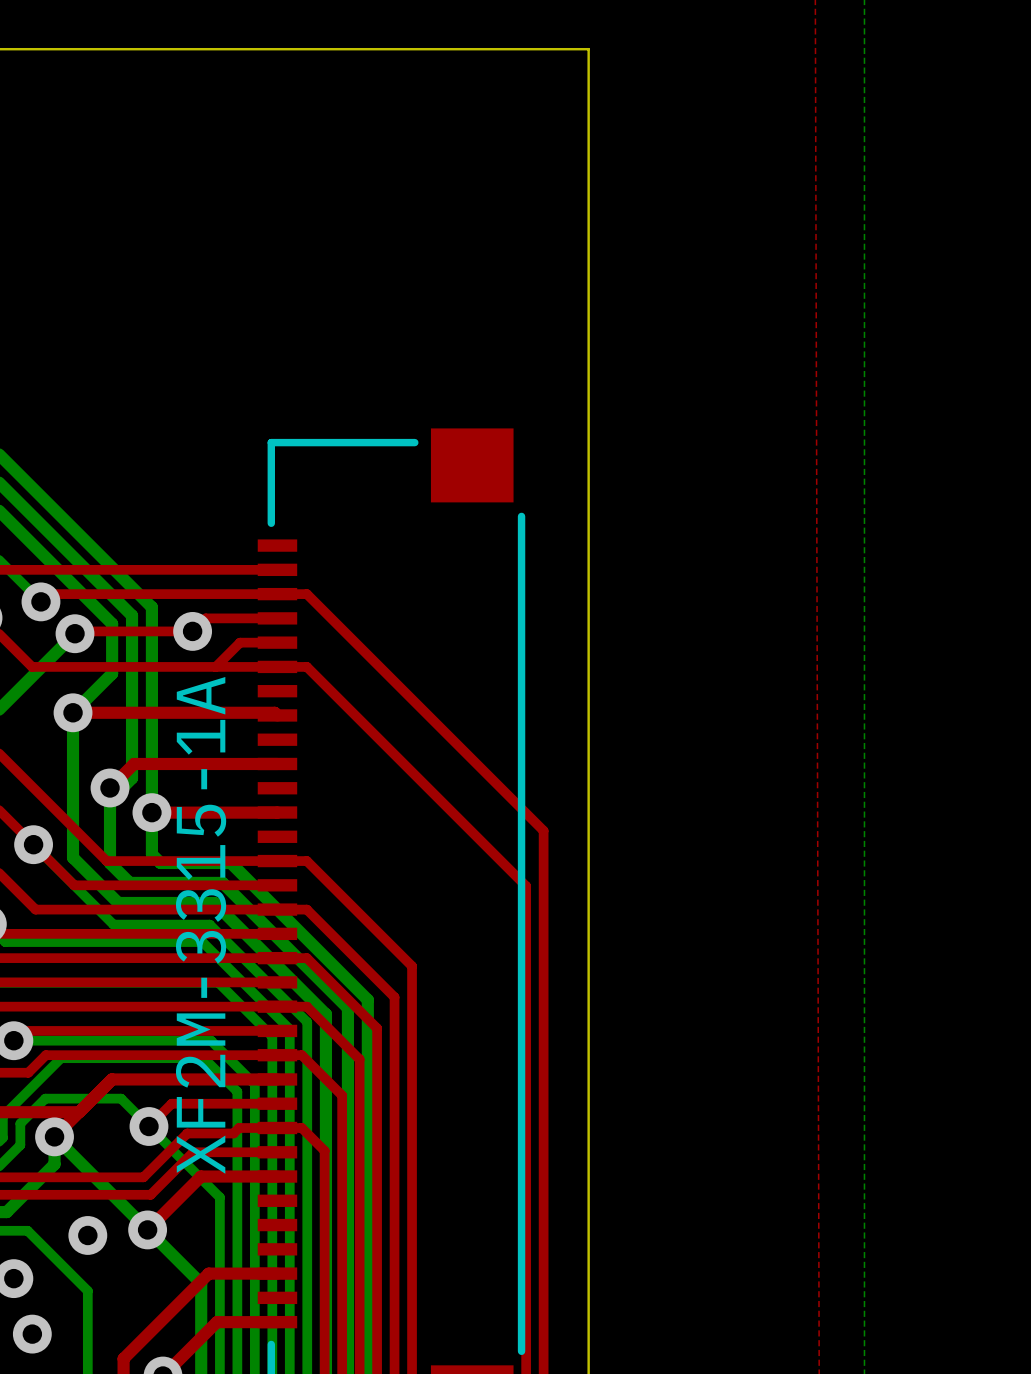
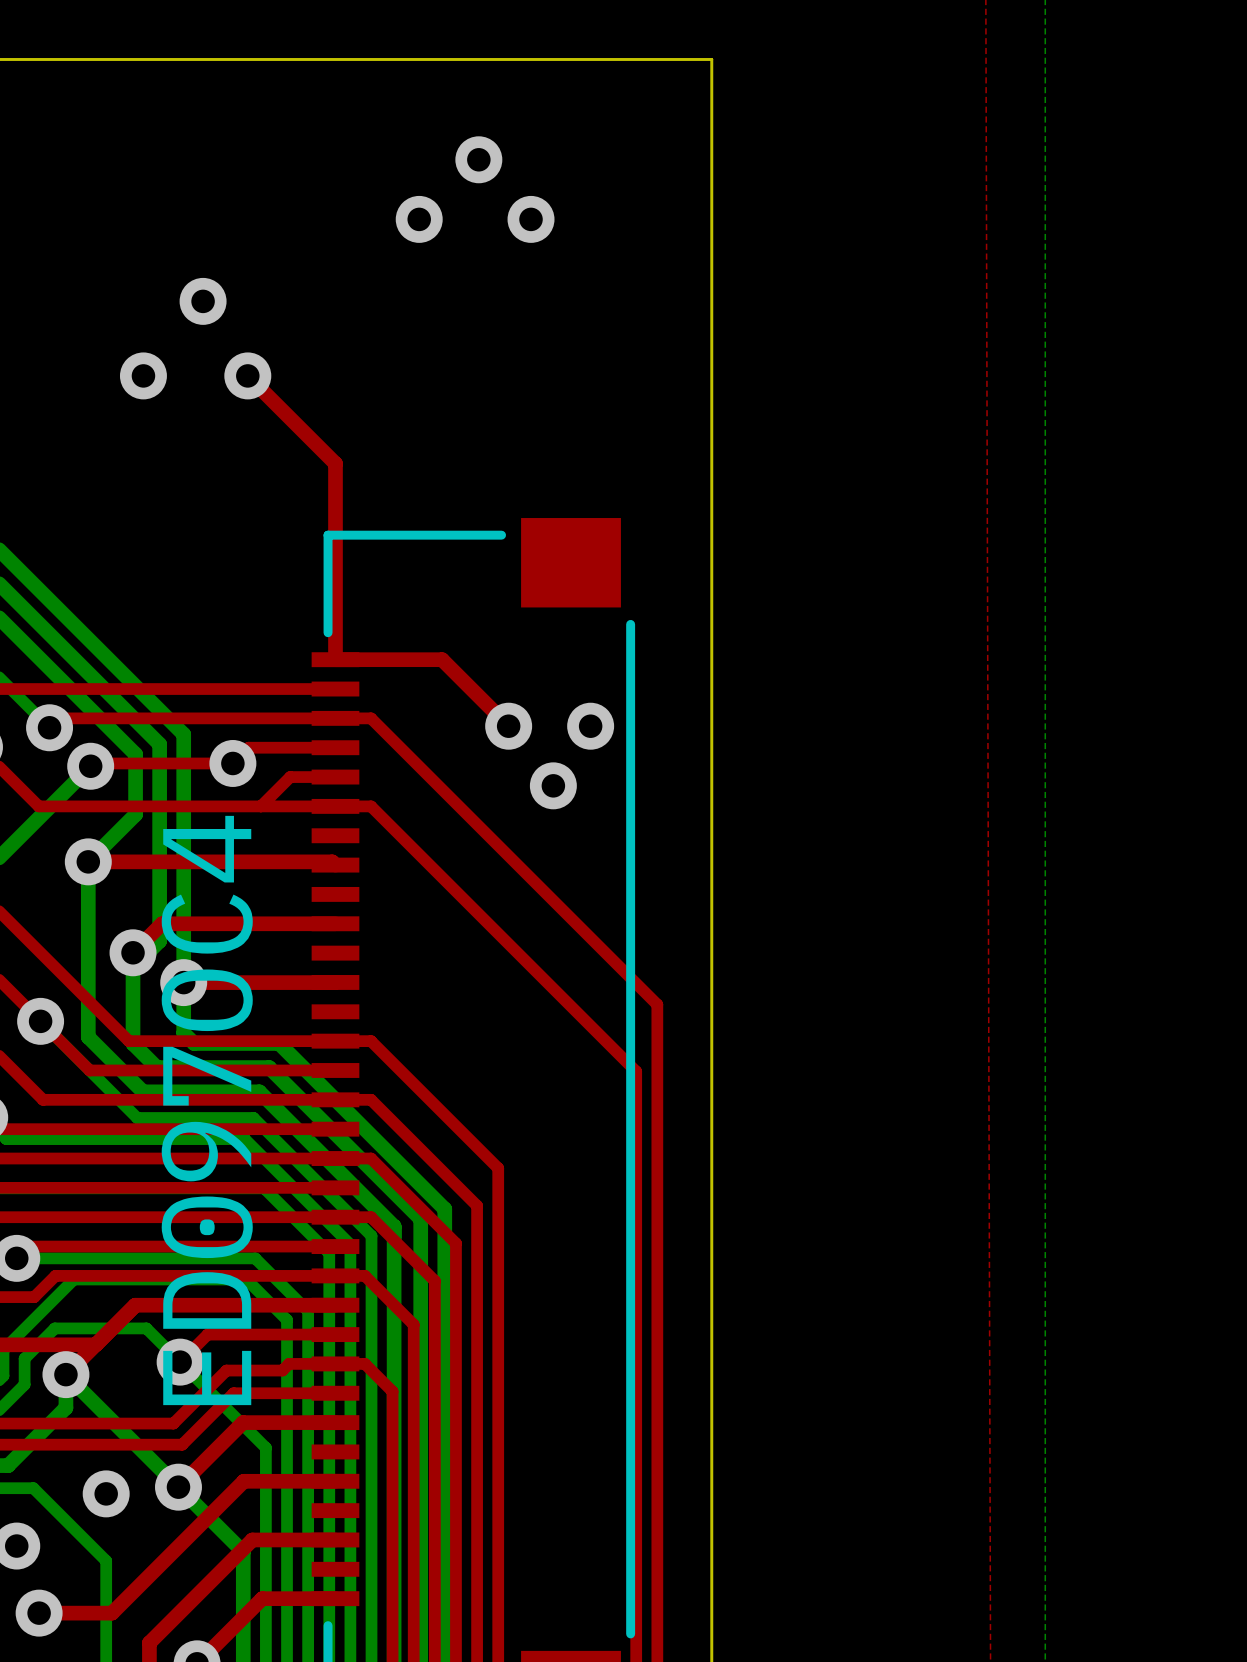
via: none -> (478, 159)
via: none -> (419, 219)
via: none -> (531, 219)
via: none -> (203, 301)
via: none -> (143, 375)
top track: none -> (247, 375) (335, 463) (335, 659) (442, 659) (508, 726)
via: none -> (247, 375)
via: none -> (508, 726)
via: none -> (590, 726)
via: none -> (553, 785)
text: none -> ED097OC4 (207, 1110)
part value: XF2M-3315-1A (201, 925) -> none
top track: none -> (335, 1481) (243, 1481) (112, 1613) (39, 1613)

